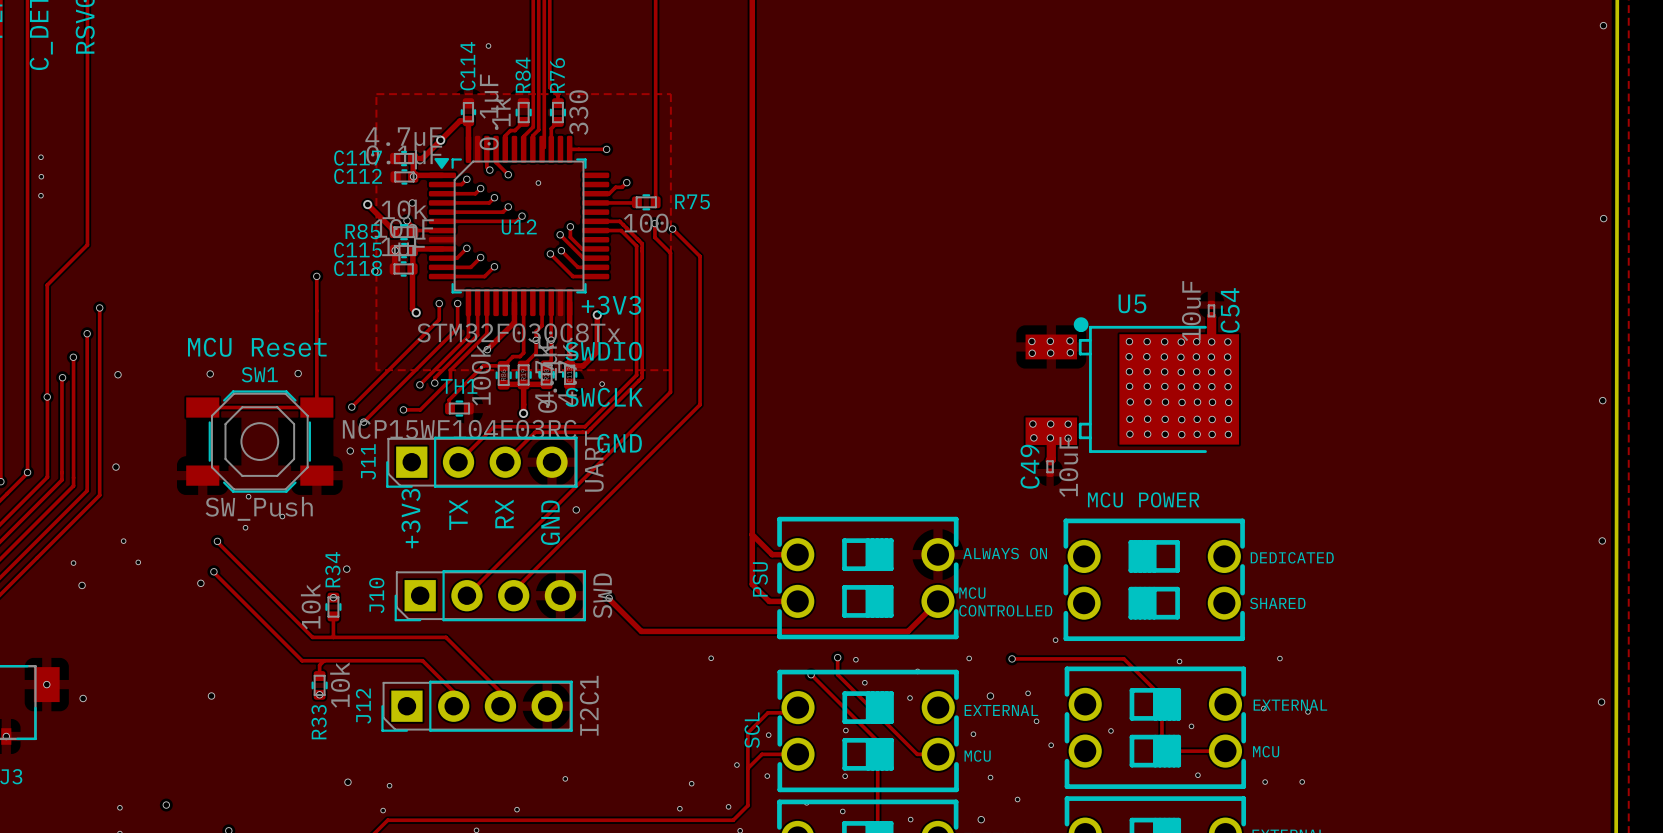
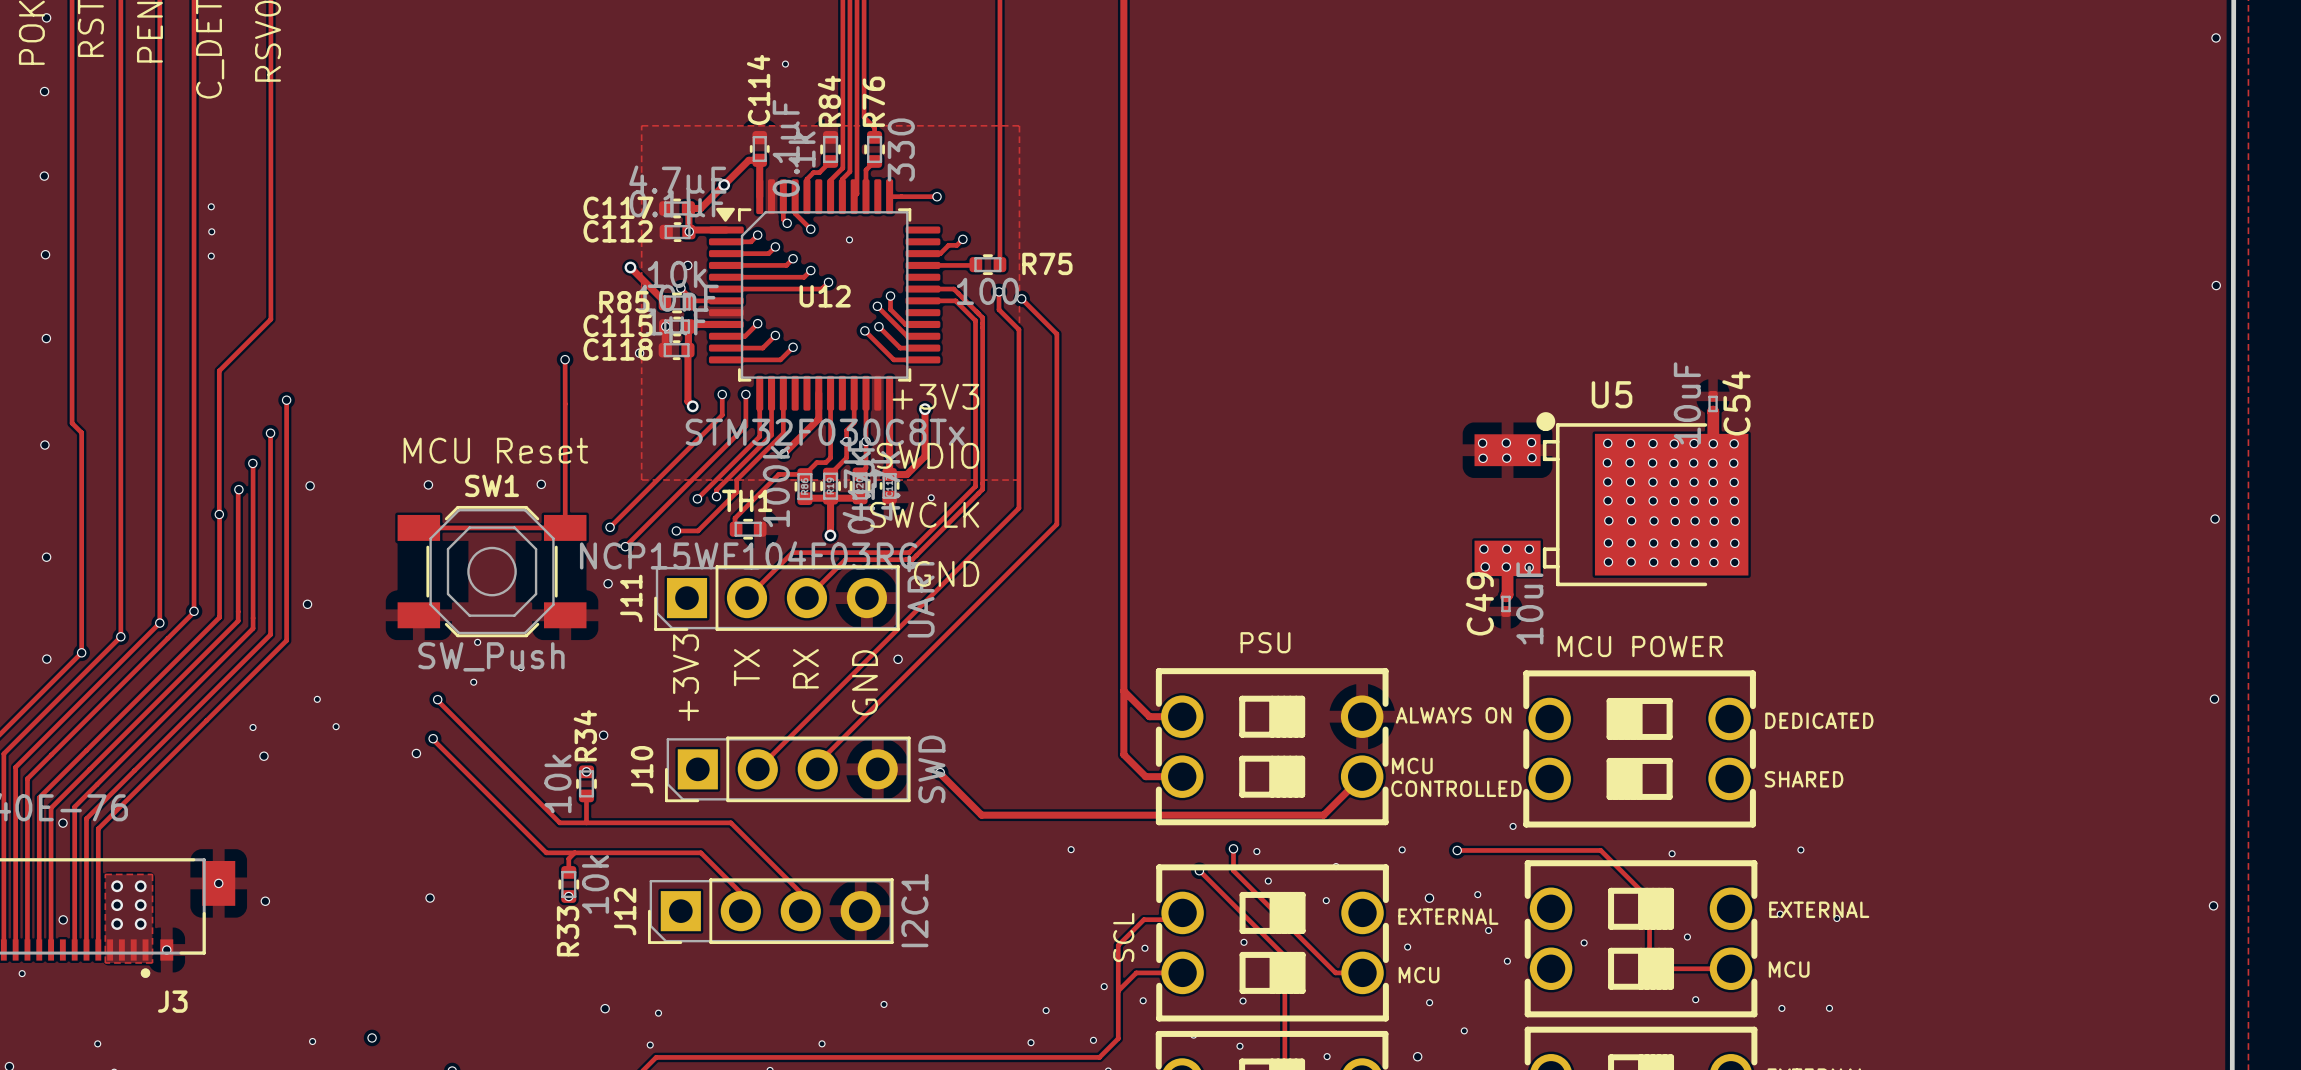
text rotation: 0° (760, 579) -> 90° clockwise (1265, 642)
text position: PSU (760, 579) -> PSU (1265, 642)

